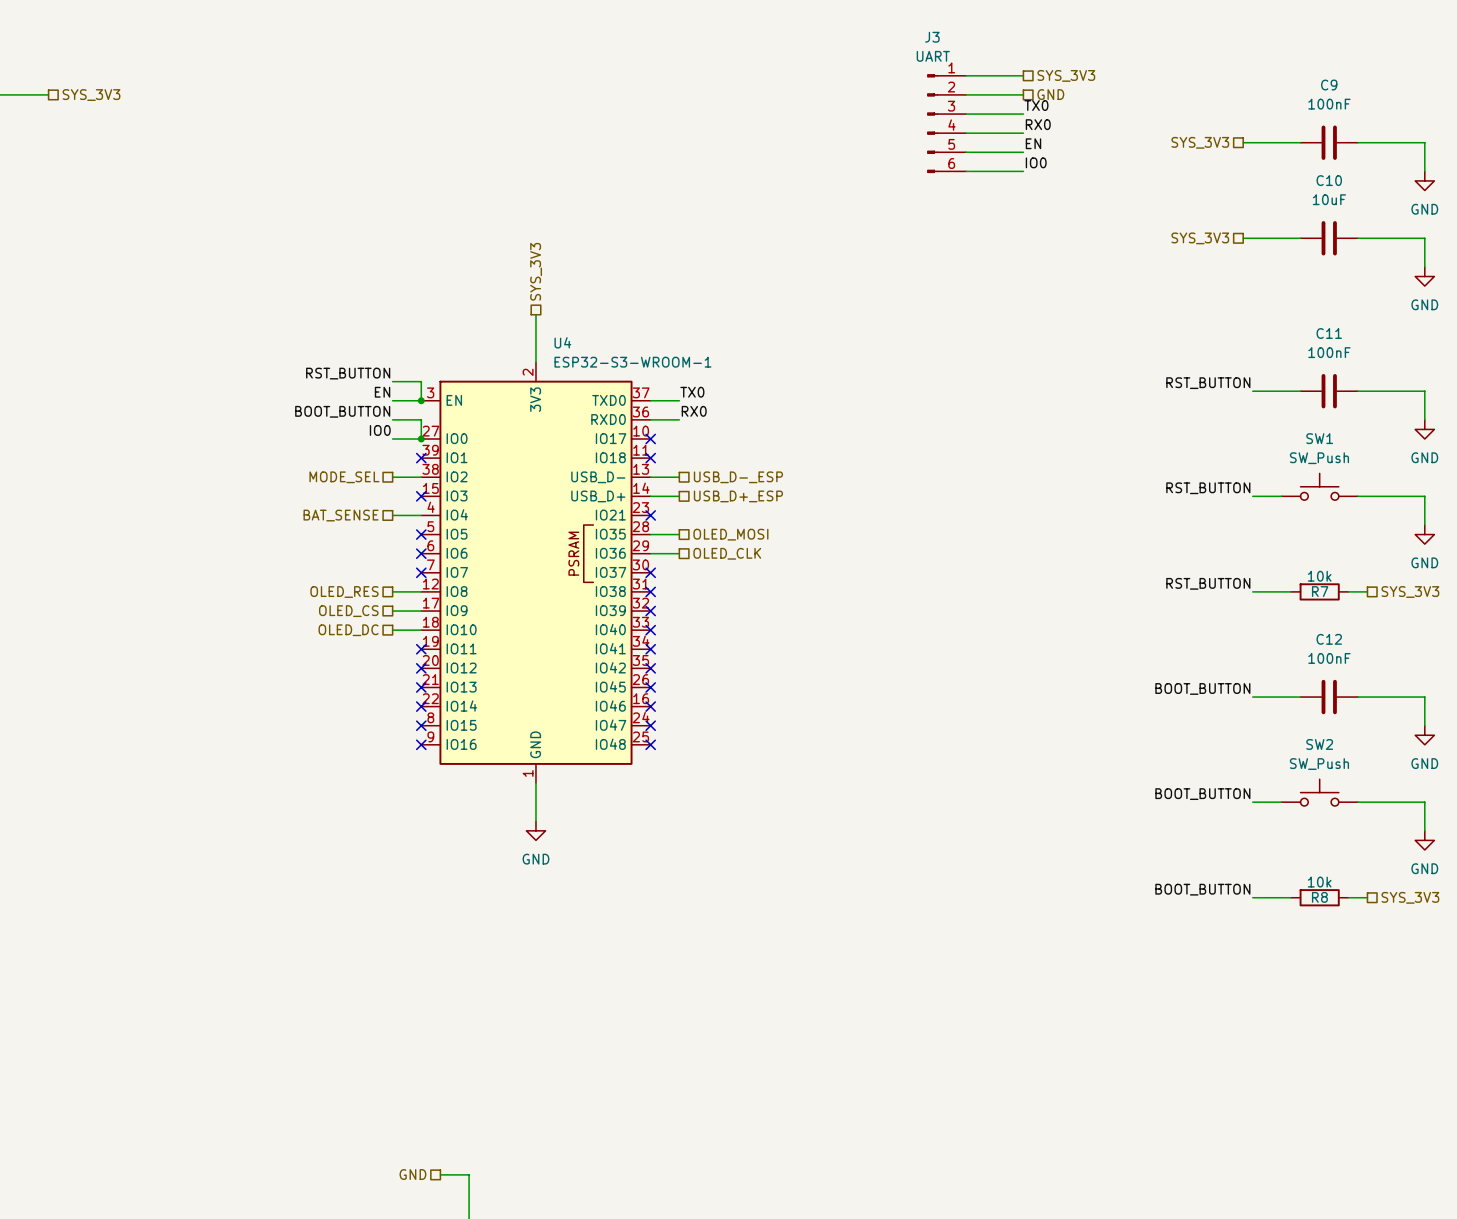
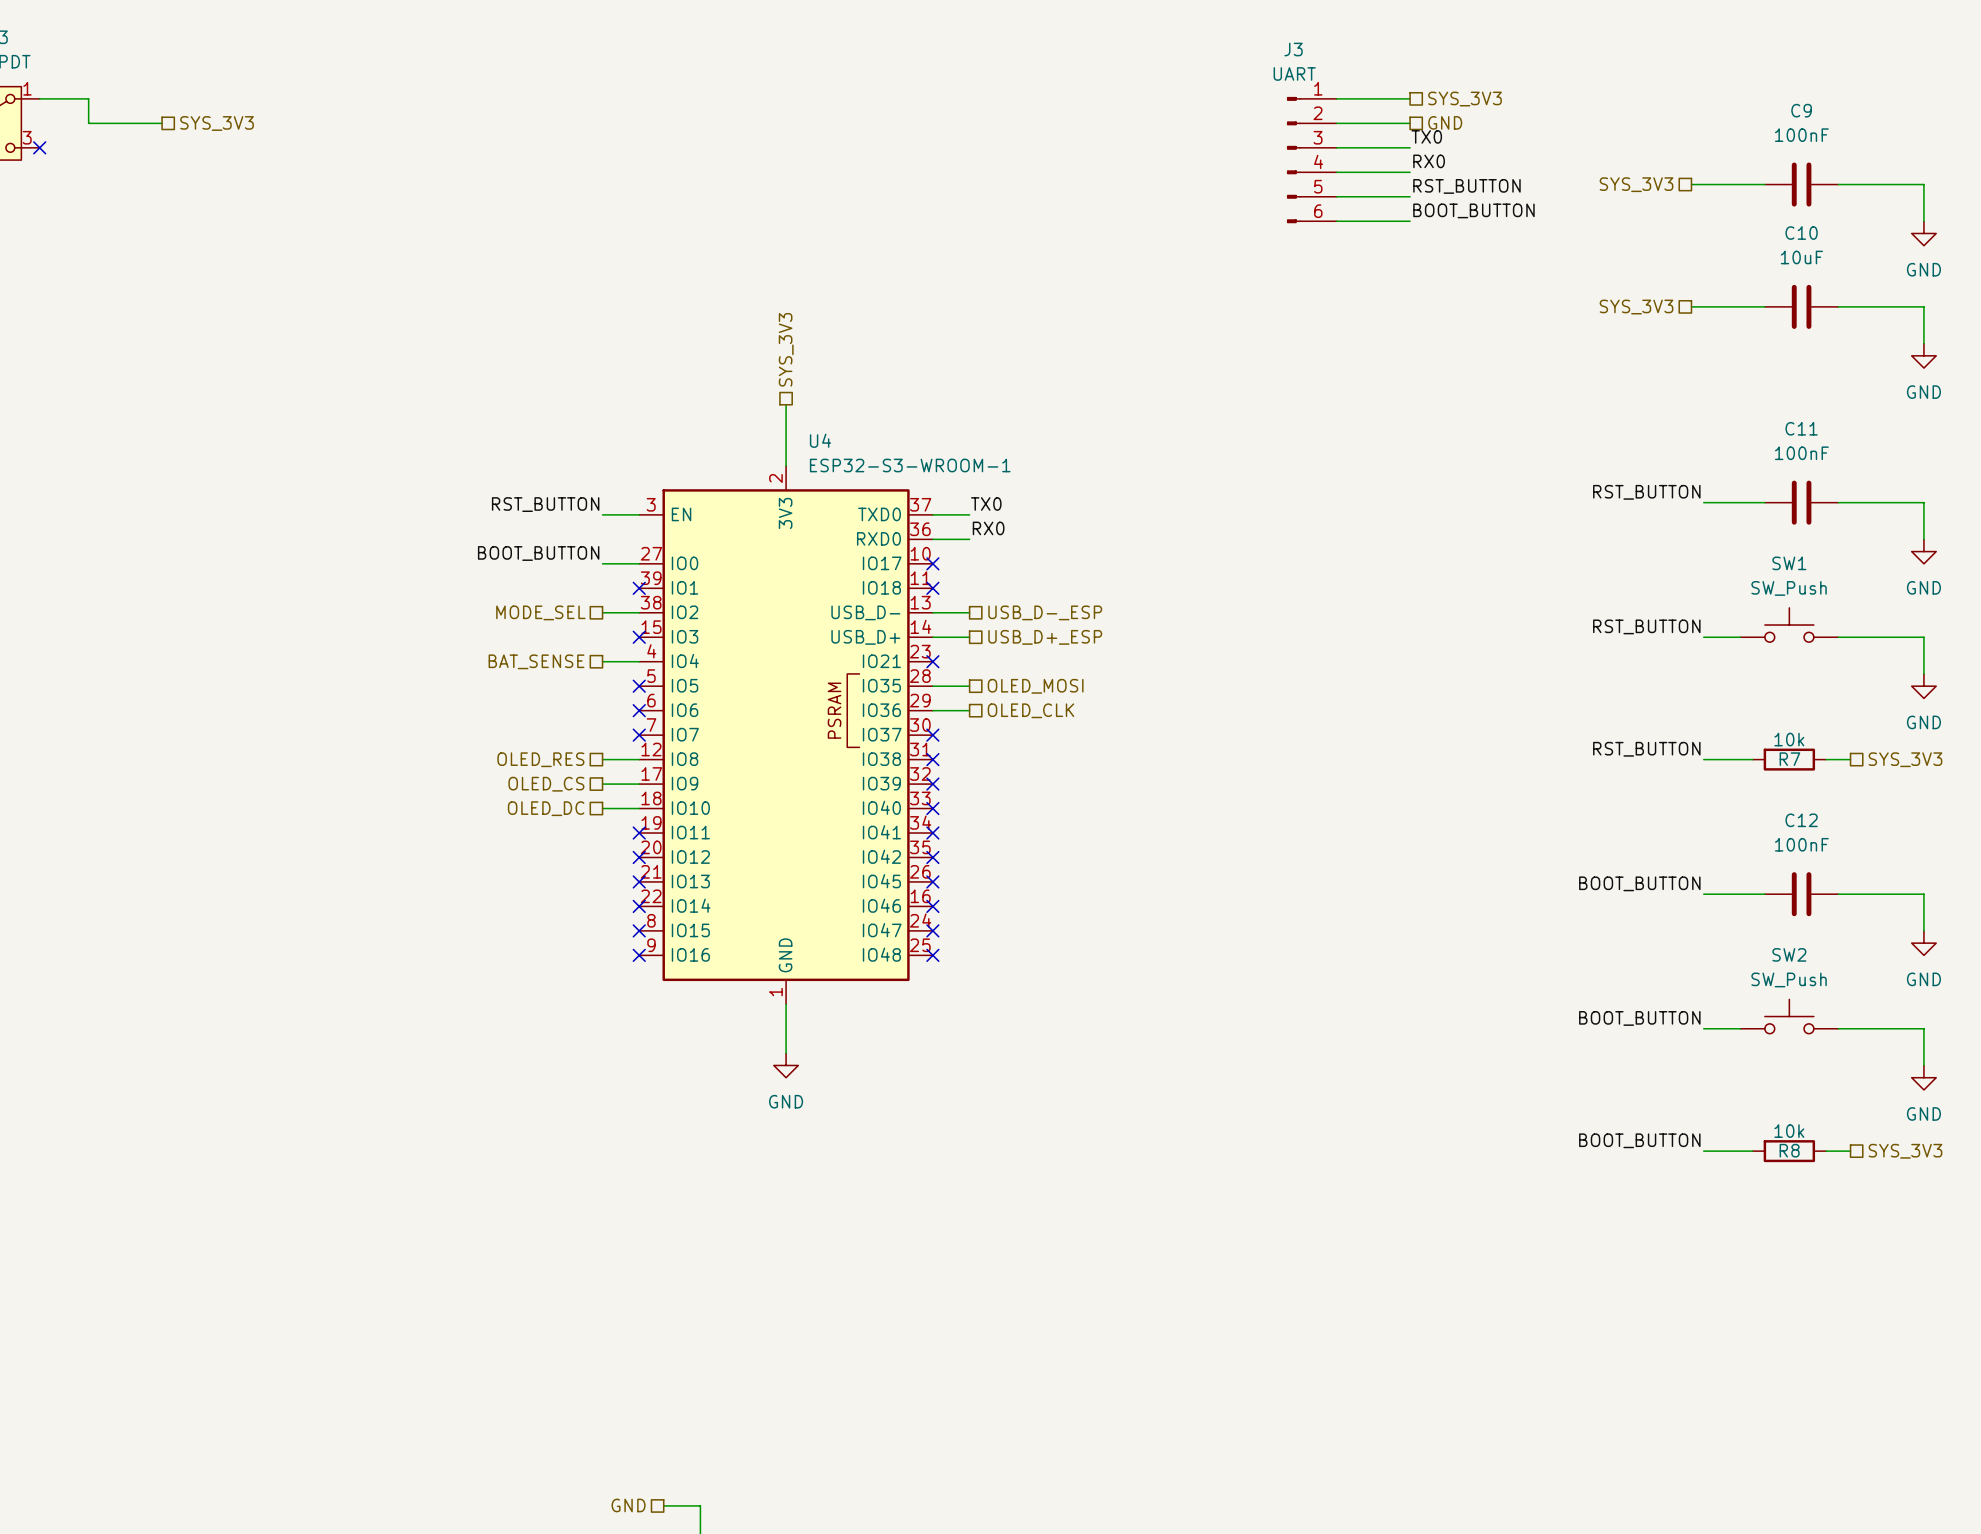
label: EN (1033, 143) -> RST_BUTTON (1466, 186)
label: IO0 (1036, 162) -> BOOT_BUTTON (1473, 210)
label: RST_BUTTON (348, 373) -> none
wire: (392, 381) (421, 381) (421, 400) -> none
label: EN (382, 392) -> RST_BUTTON (545, 504)
junction: (421, 400) -> none
label: BOOT_BUTTON (342, 411) -> none
wire: (392, 419) (421, 419) (421, 438) -> none
label: IO0 (380, 430) -> BOOT_BUTTON (538, 553)
junction: (421, 438) -> none

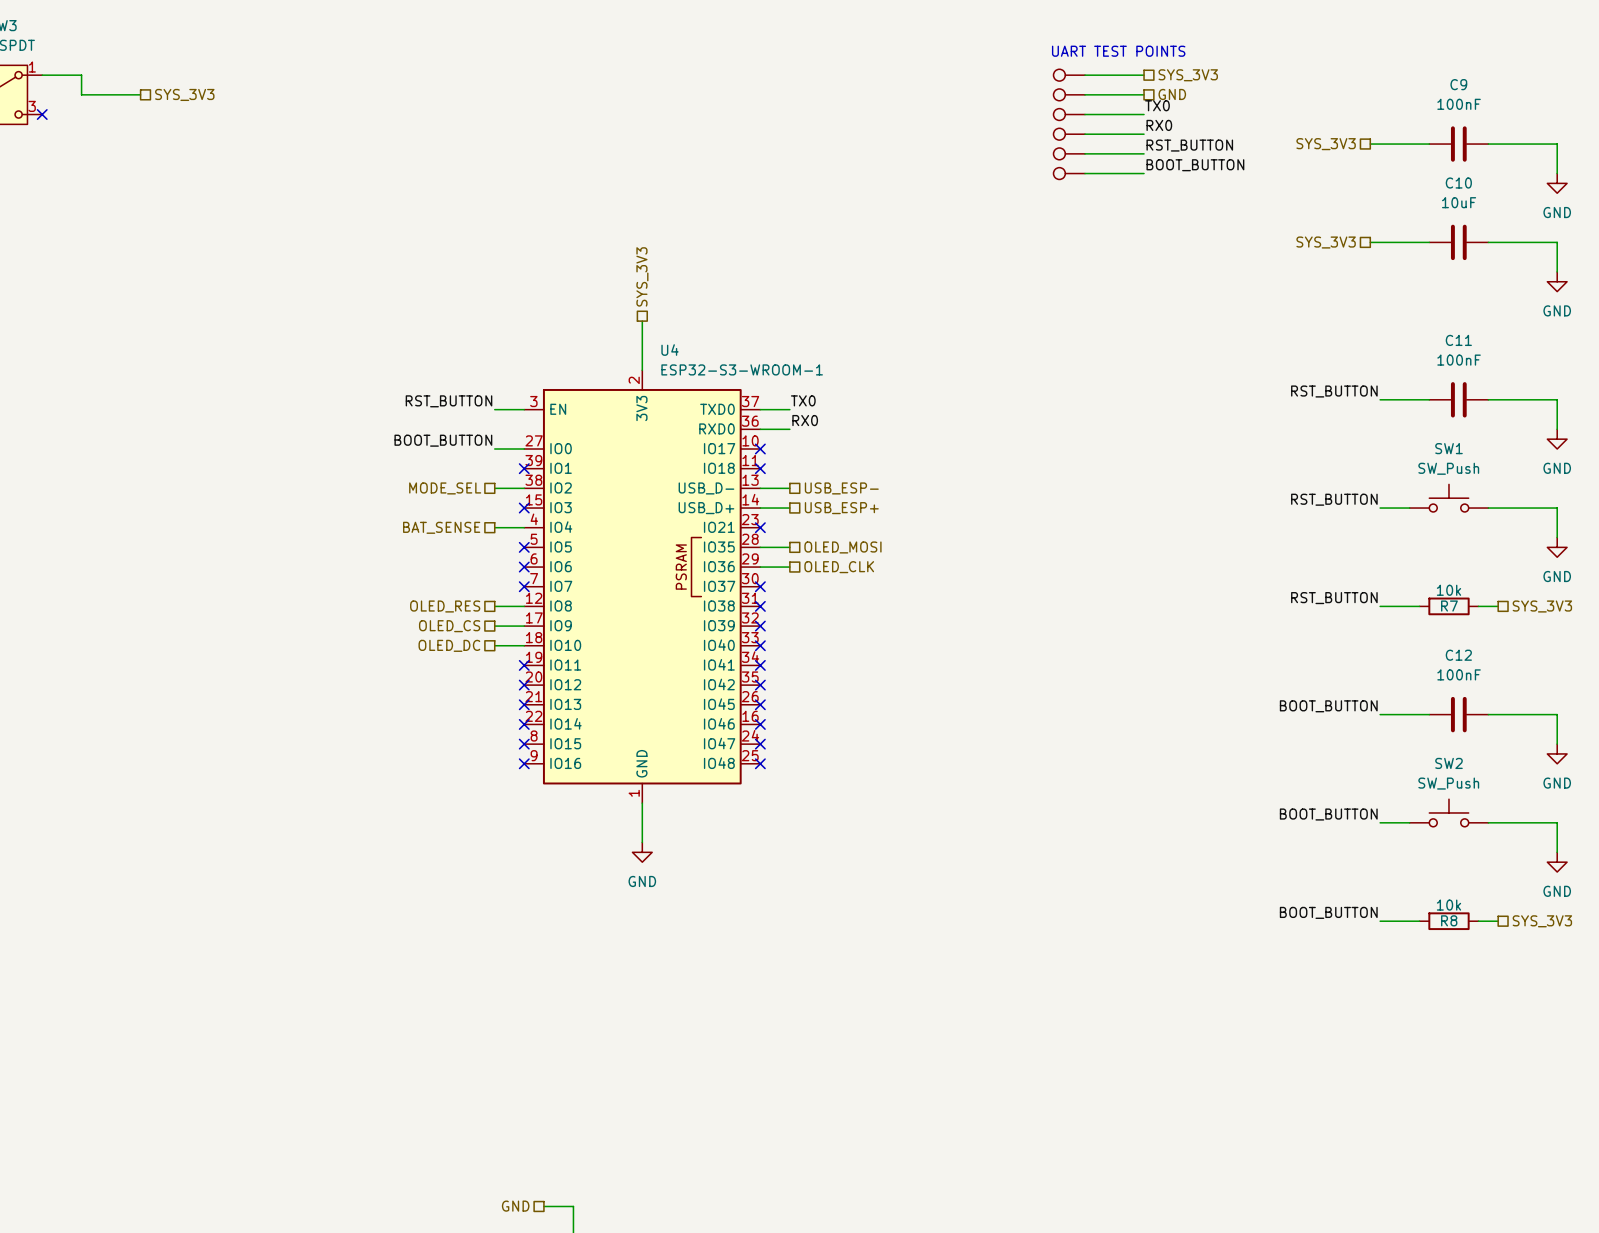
text: none -> UART TEST POINTS (1118, 51)
part: none -> (1069, 75)
part: none -> (1069, 94)
part: none -> (1069, 114)
J3: UART (1311, 160) -> none
part: none -> (1069, 134)
part: none -> (1069, 153)
part: none -> (1069, 173)
hierarchical label: USB_D-_ESP (1045, 612) -> USB_ESP- (841, 488)
hierarchical label: USB_D+_ESP (1045, 637) -> USB_ESP+ (841, 508)

